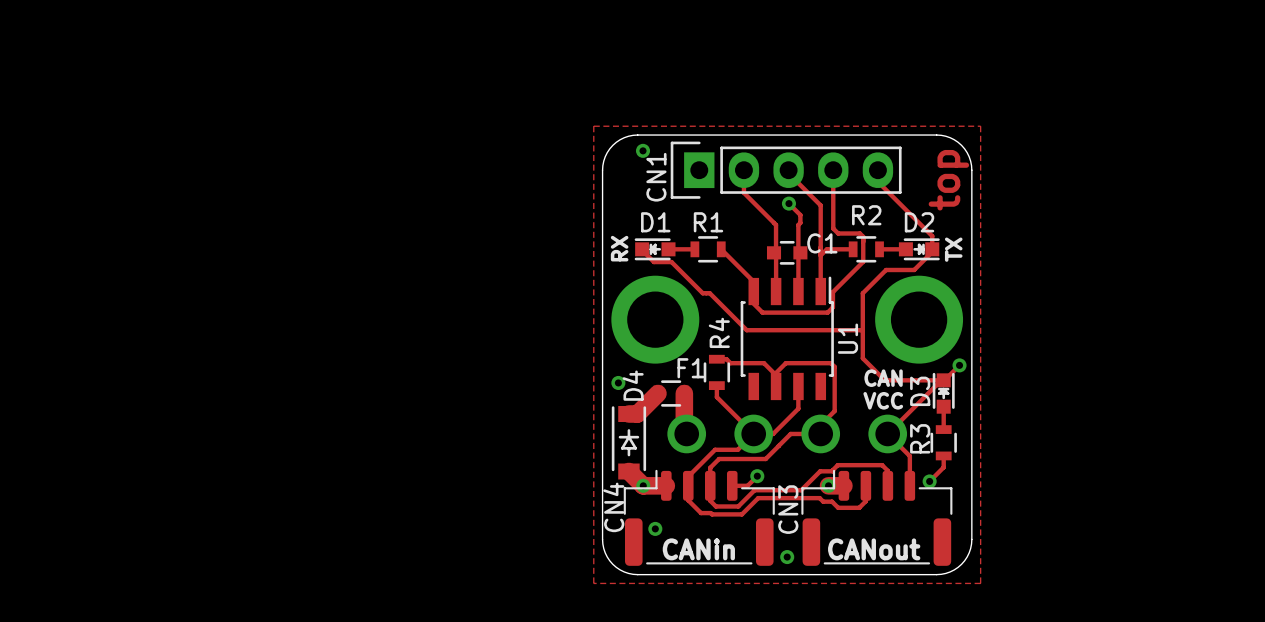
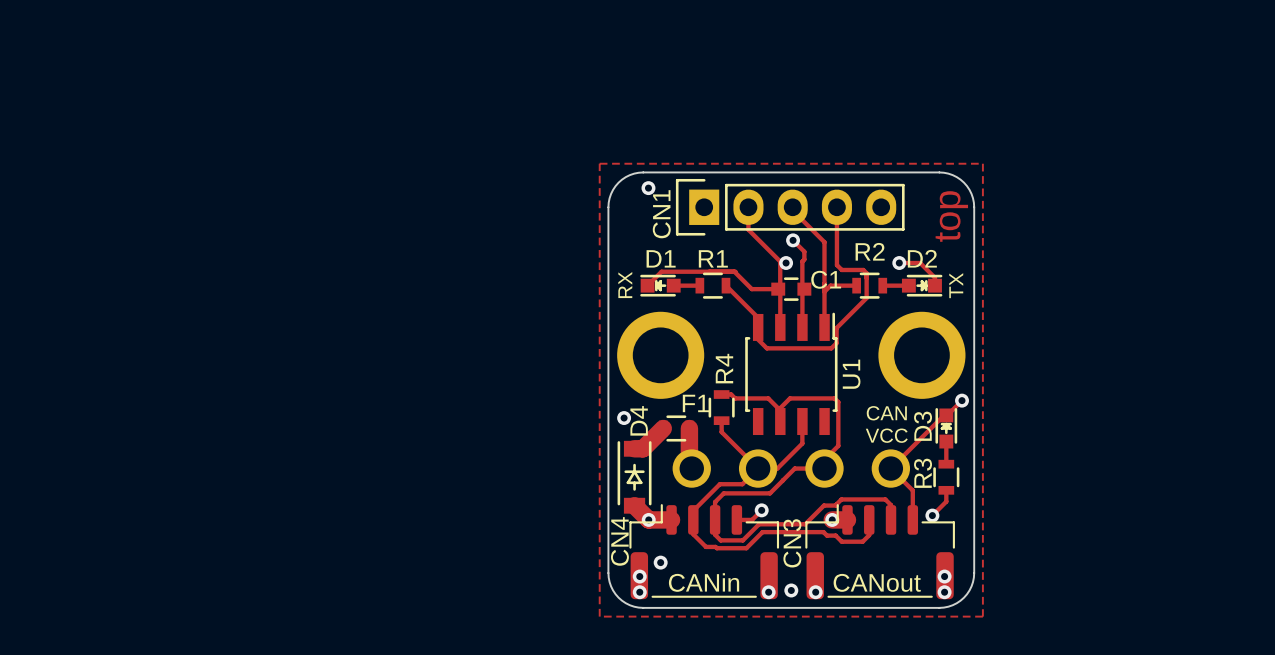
track: (877, 170) (877, 181) (932, 236) (932, 241) -> (899, 263) (920, 263) (935, 277)
via: none -> (786, 263)
via: none -> (899, 263)
track: none -> (734, 271) (751, 289) (778, 289)
track: (642, 249) (653, 262) (671, 262) (702, 293) (709, 293) (746, 330) (862, 330) -> (647, 285) (661, 271) (735, 271)
track: (932, 249) (932, 251) (914, 269) (886, 269) (862, 293) (862, 358) (884, 380) (941, 380) -> none
via: none -> (639, 576)
via: none -> (944, 576)
via: none -> (639, 592)
via: none -> (768, 592)
via: none -> (815, 592)
via: none -> (944, 592)

